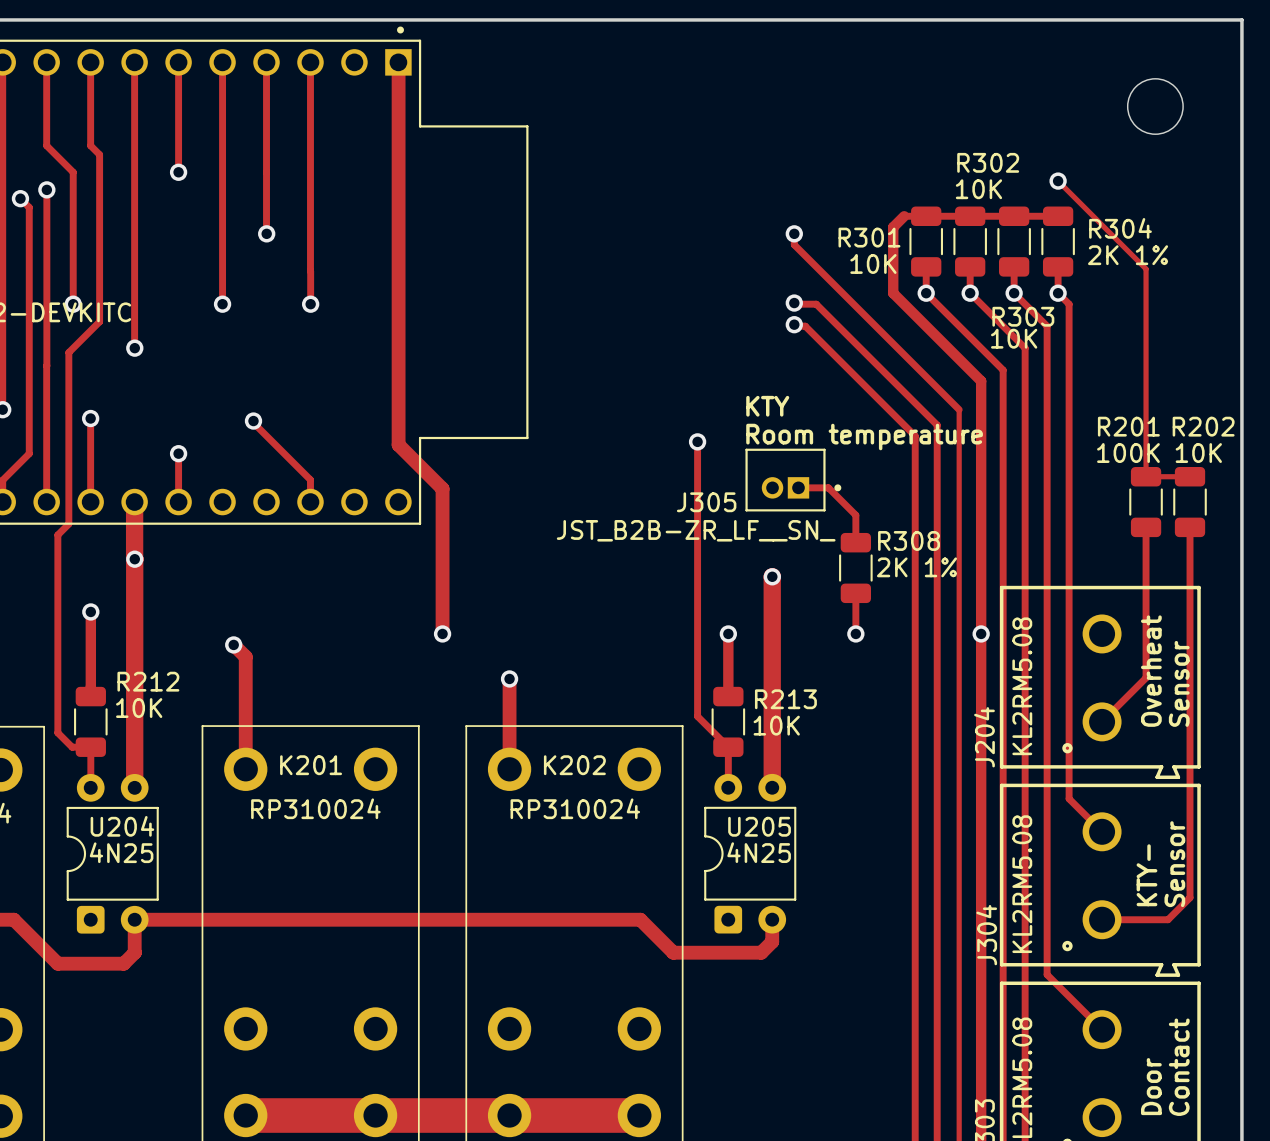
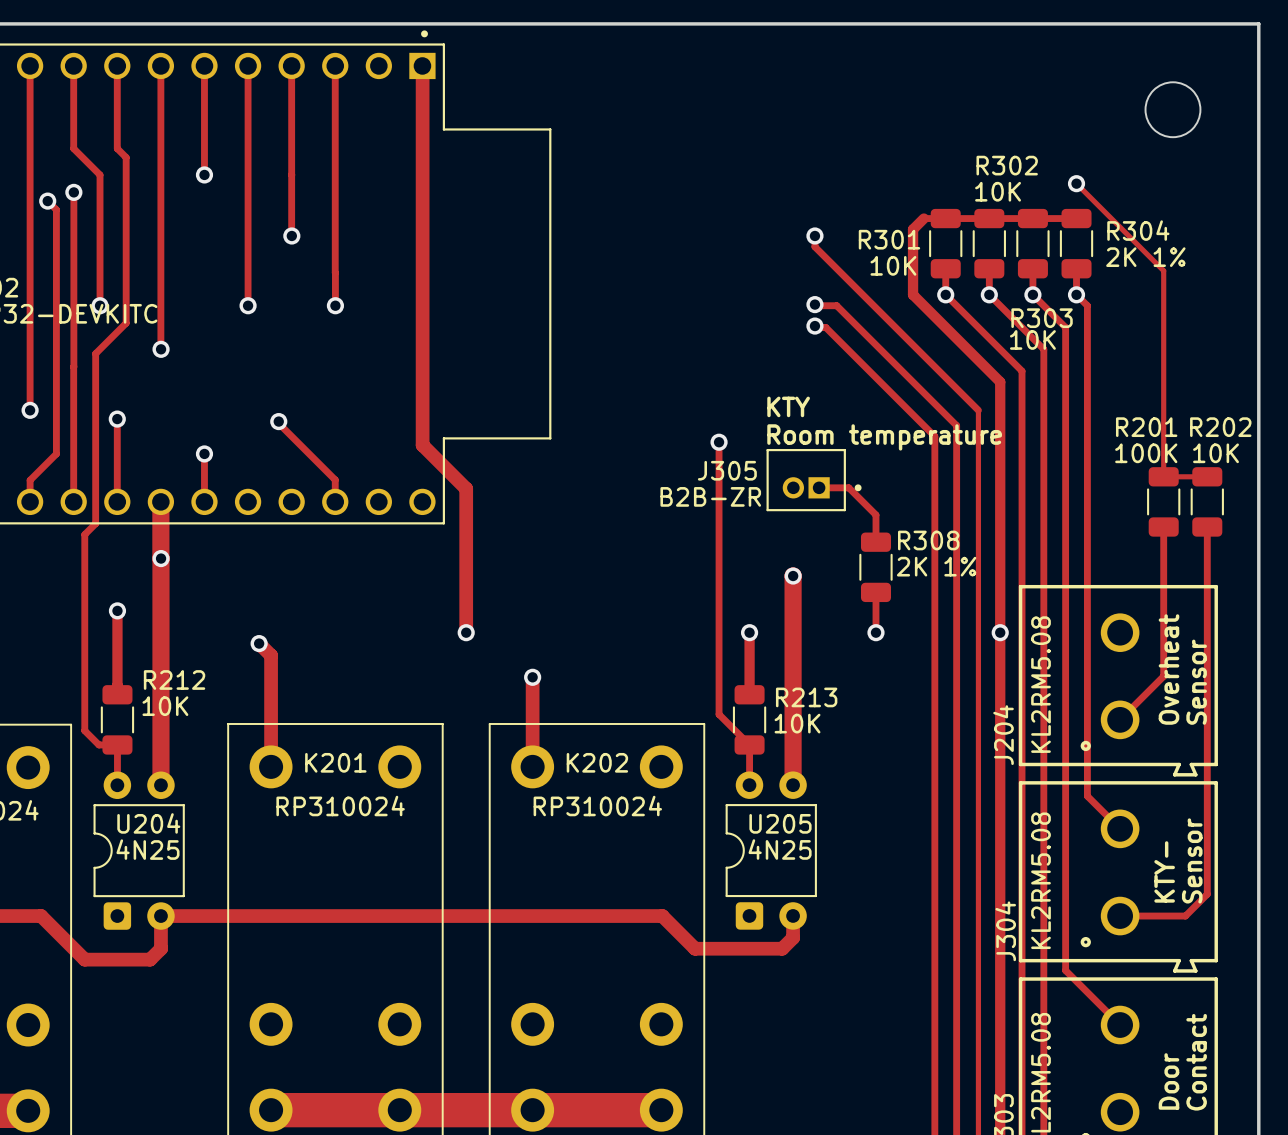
J305 name position: J305 (706, 502) -> J305 (727, 470)
J305 value: JST_B2B-ZR_LF__SN_ (696, 530) -> B2B-ZR (710, 496)

